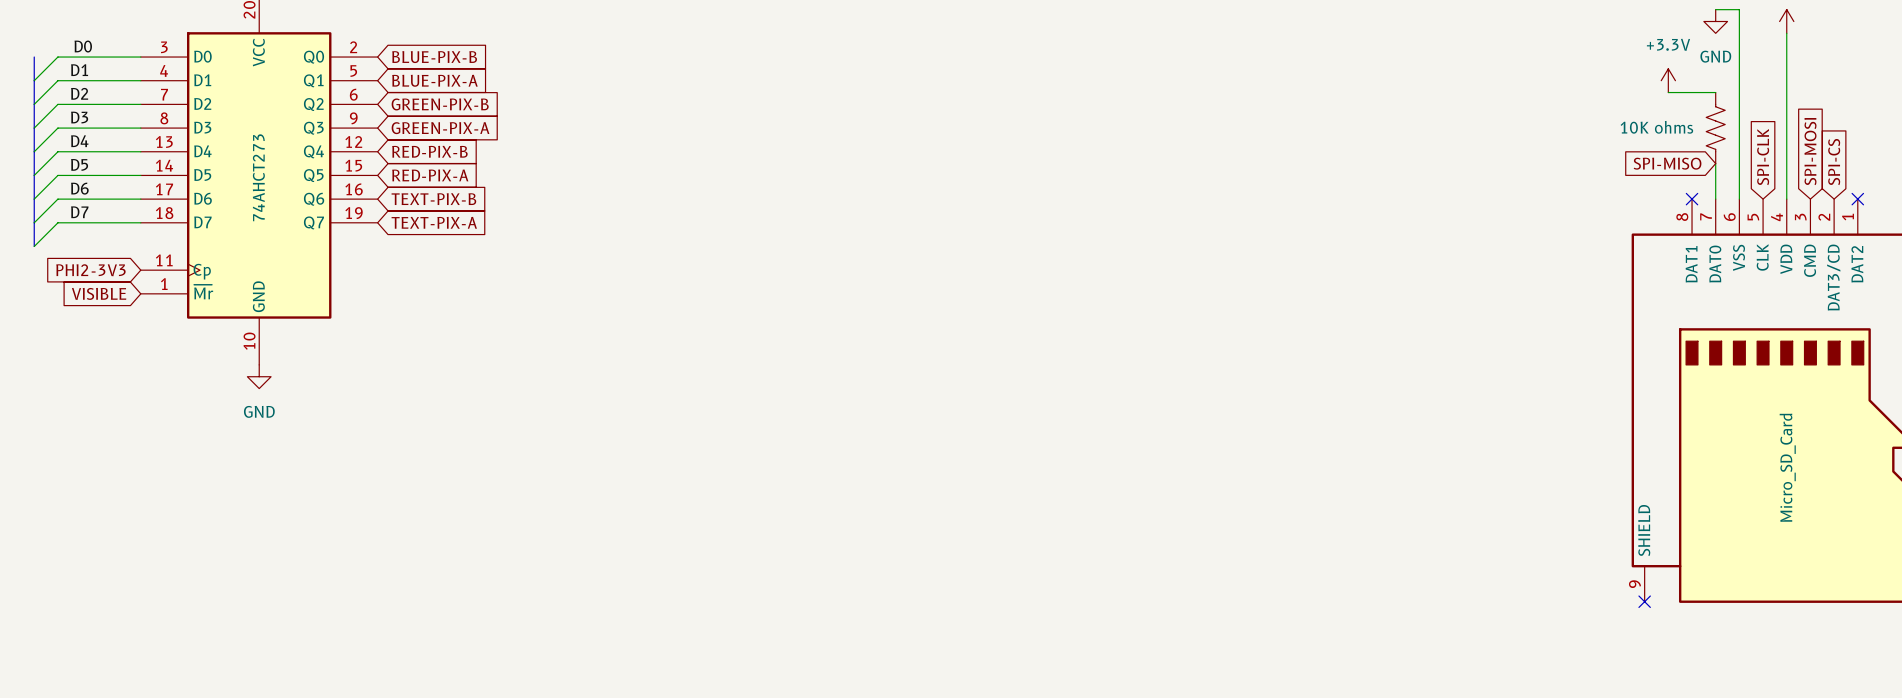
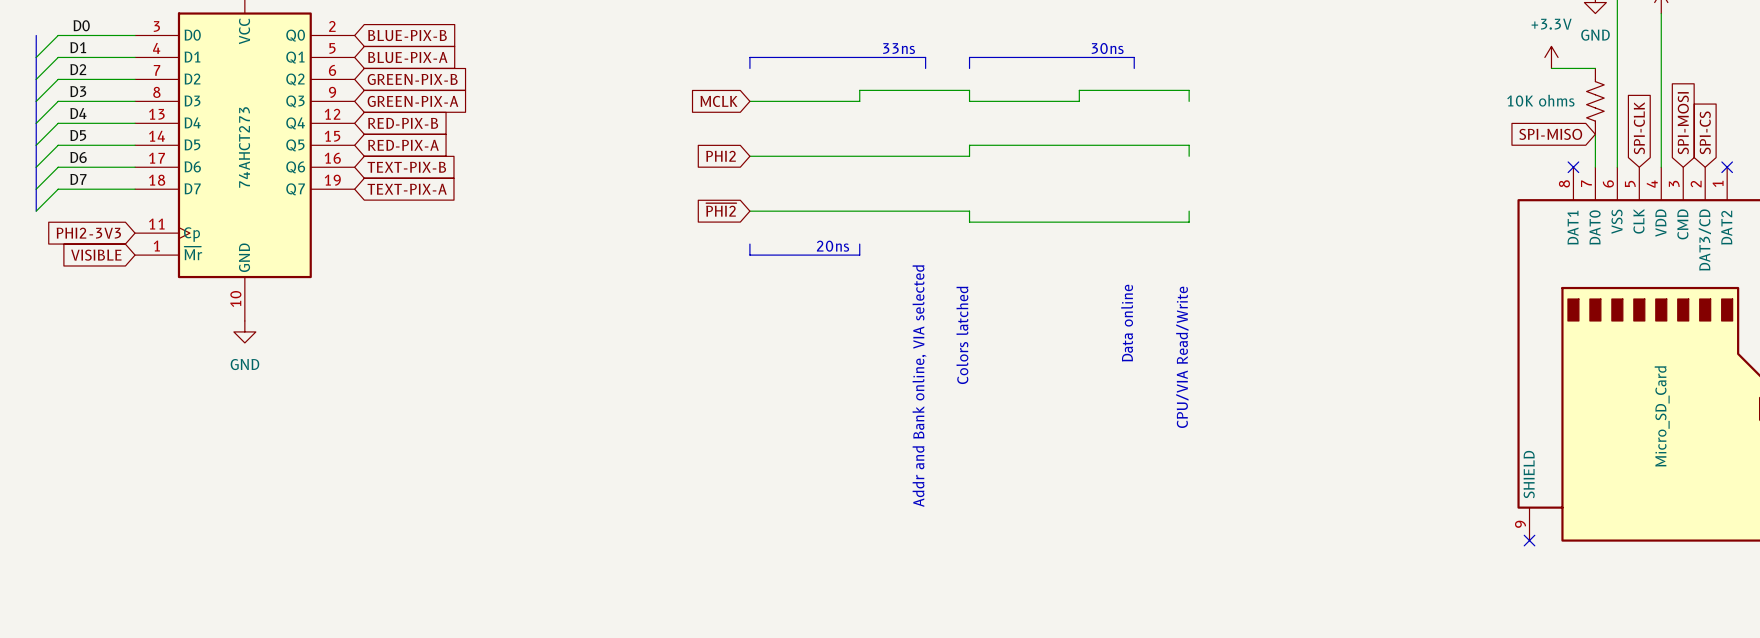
text: none -> 33ns (899, 48)
text: none -> 30ns (1107, 48)
bus: none -> (749, 68) (749, 57) (925, 57) (925, 68)
bus: none -> (969, 68) (969, 57) (1134, 57) (1134, 68)
global label: none -> MCLK (719, 101)
wire: none -> (749, 101) (859, 101) (859, 90) (969, 90) (969, 101) (1079, 101) (1079, 90) (1189, 90) (1189, 101)
global label: none -> PHI2 (721, 156)
wire: none -> (749, 156) (969, 156) (969, 145) (1189, 145) (1189, 156)
global label: none -> ~{PHI2} (721, 209)
wire: none -> (749, 211) (969, 211) (969, 222) (1189, 222) (1189, 211)
bus: none -> (749, 244) (749, 255) (859, 255) (859, 244)
text: none -> 20ns (833, 246)
text: none -> Data online (1127, 323)
text: none -> Colors latched (962, 335)
text: none -> CPU/VIA Read/Write (1182, 357)
text: none -> Addr and Bank online, VIA selected (919, 386)

